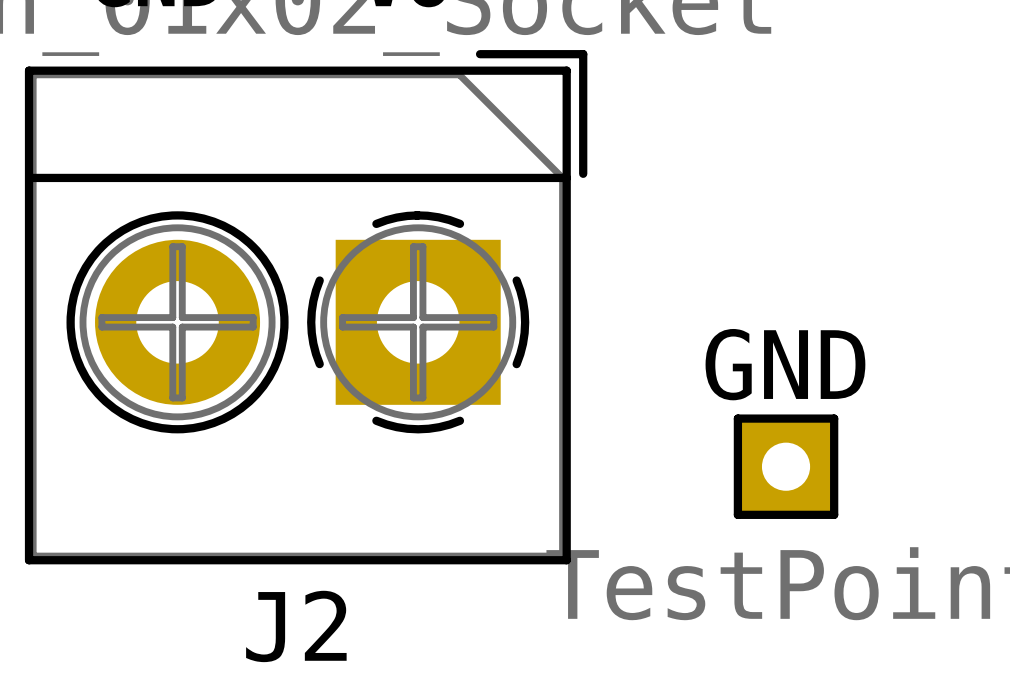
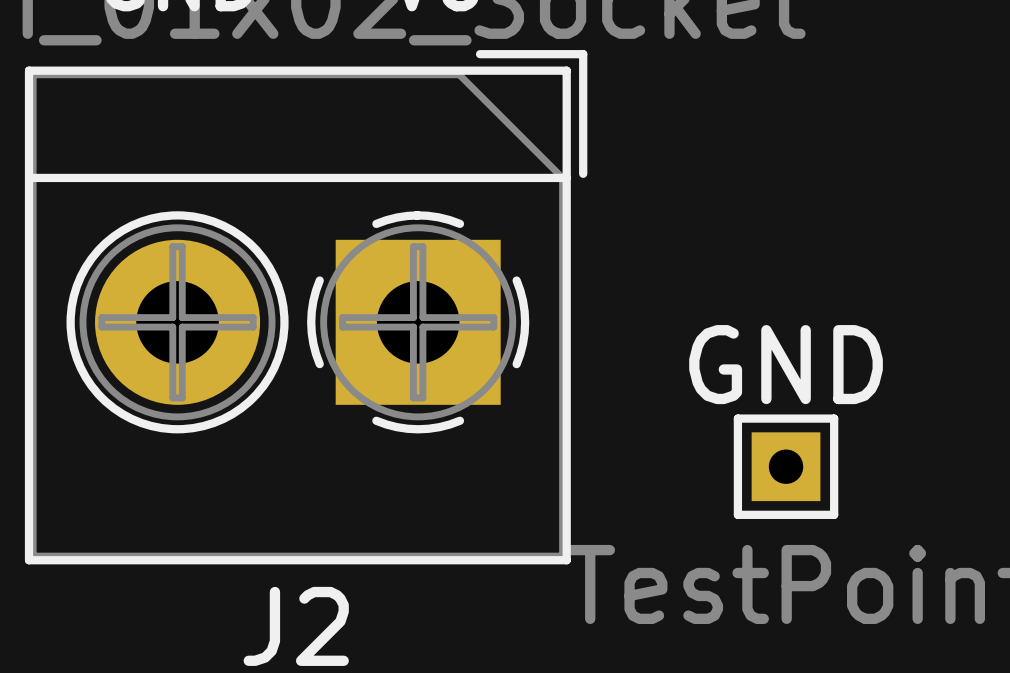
GND footprint: [733, 414, 839, 519] -> [733, 414, 839, 519]

